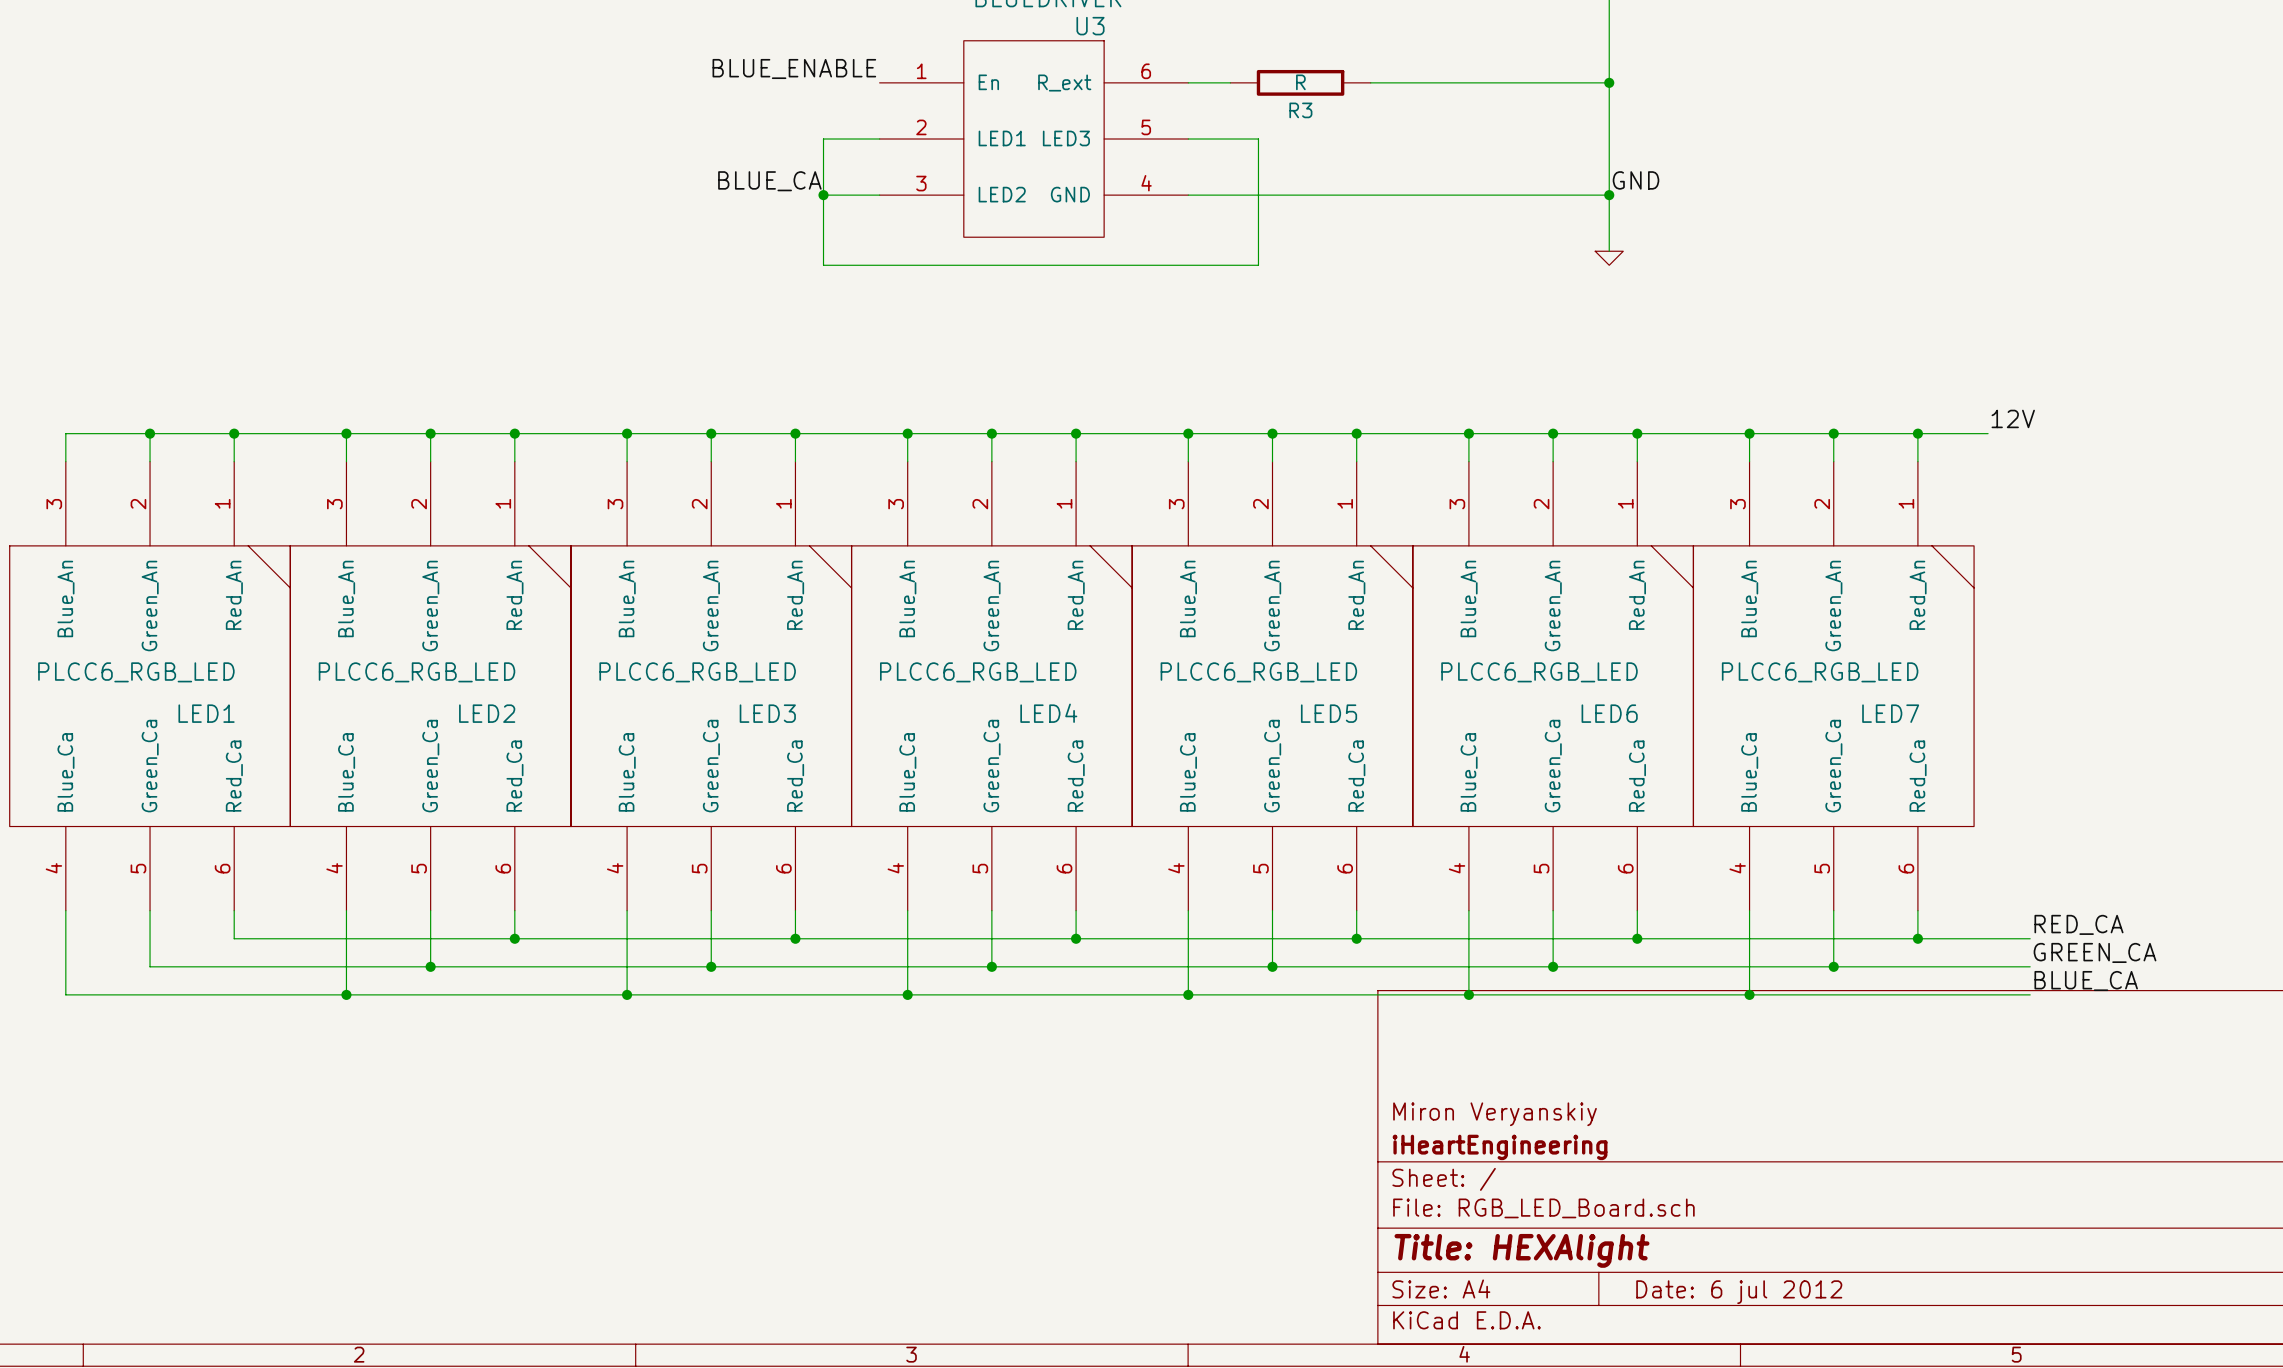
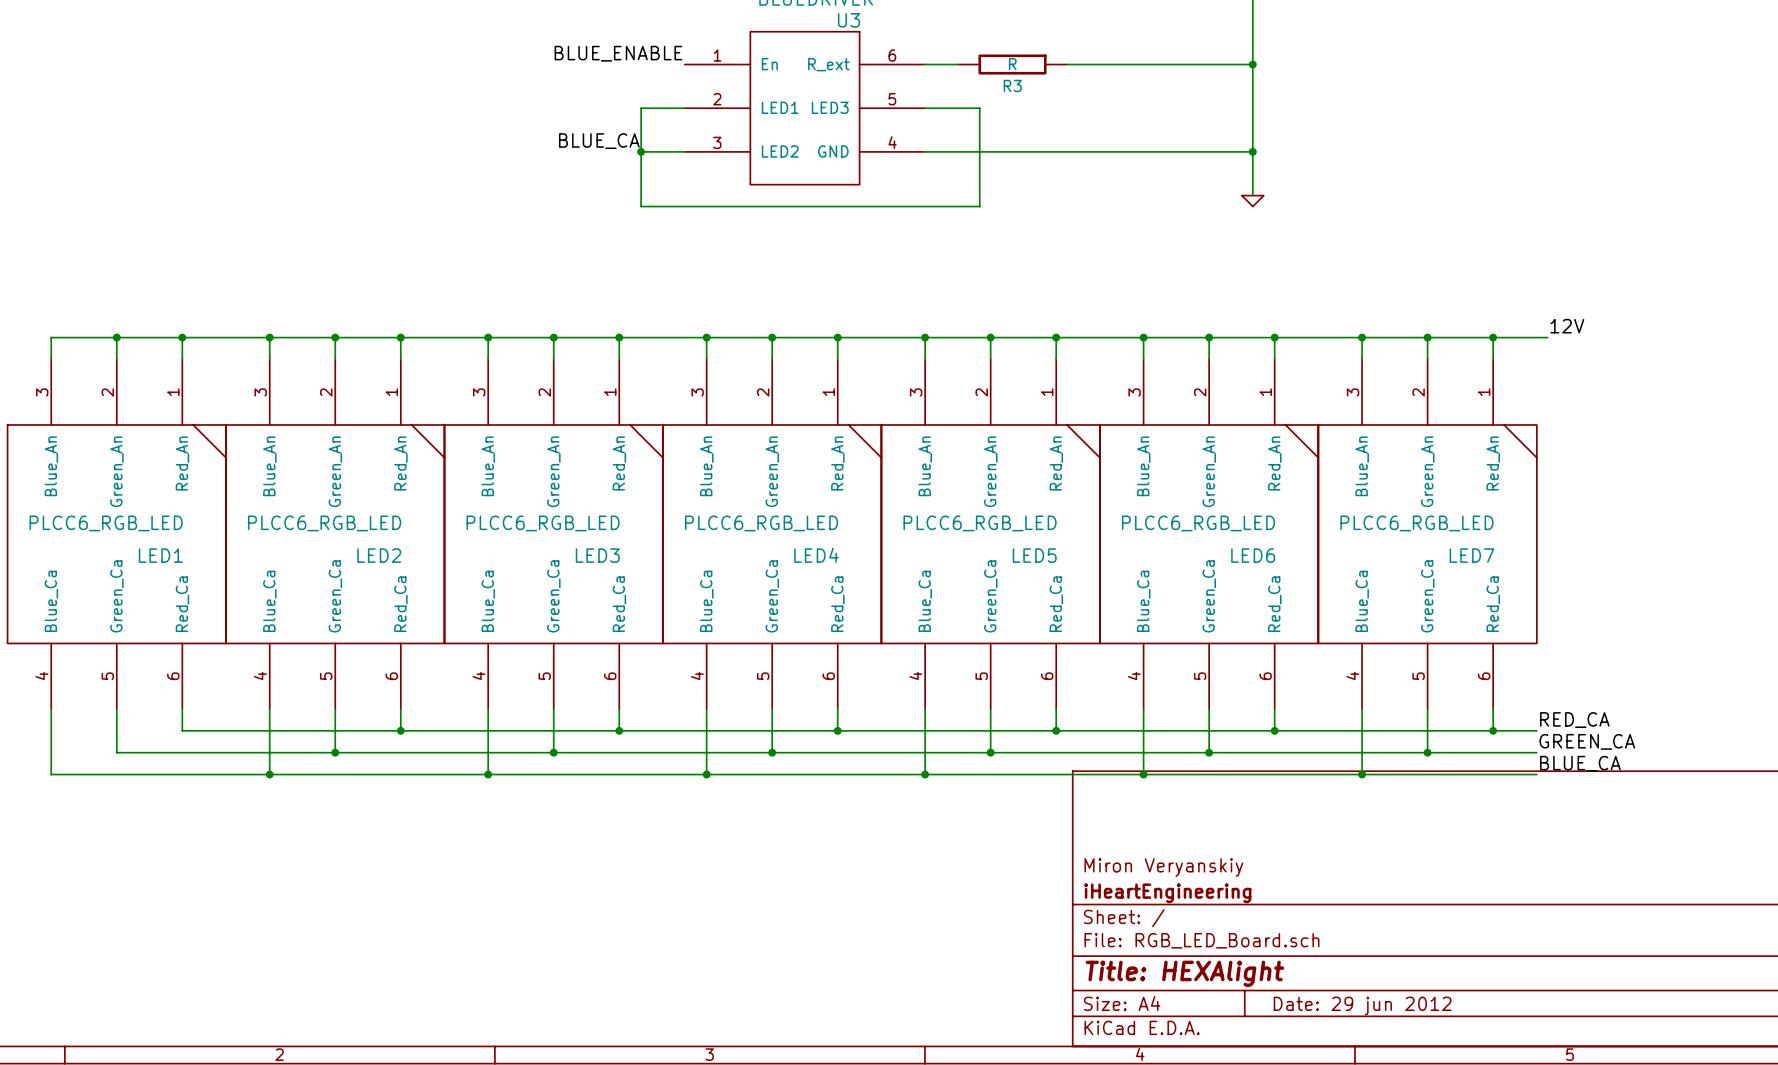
label: GND (1636, 180) -> none
label position: RED_CA (2078, 924) -> RED_CA (1574, 720)
wire: (1974, 938) (2030, 938) -> none
label position: GREEN_CA (2095, 952) -> GREEN_CA (1587, 741)
wire: (1974, 966) (2030, 966) -> none
label position: BLUE_CA (2086, 981) -> BLUE_CA (1580, 763)
wire: (1974, 994) (2030, 994) -> none
title block: Date: 6 jul 2012 (1739, 1292) -> Date: 29 jun 2012 (1362, 1005)

